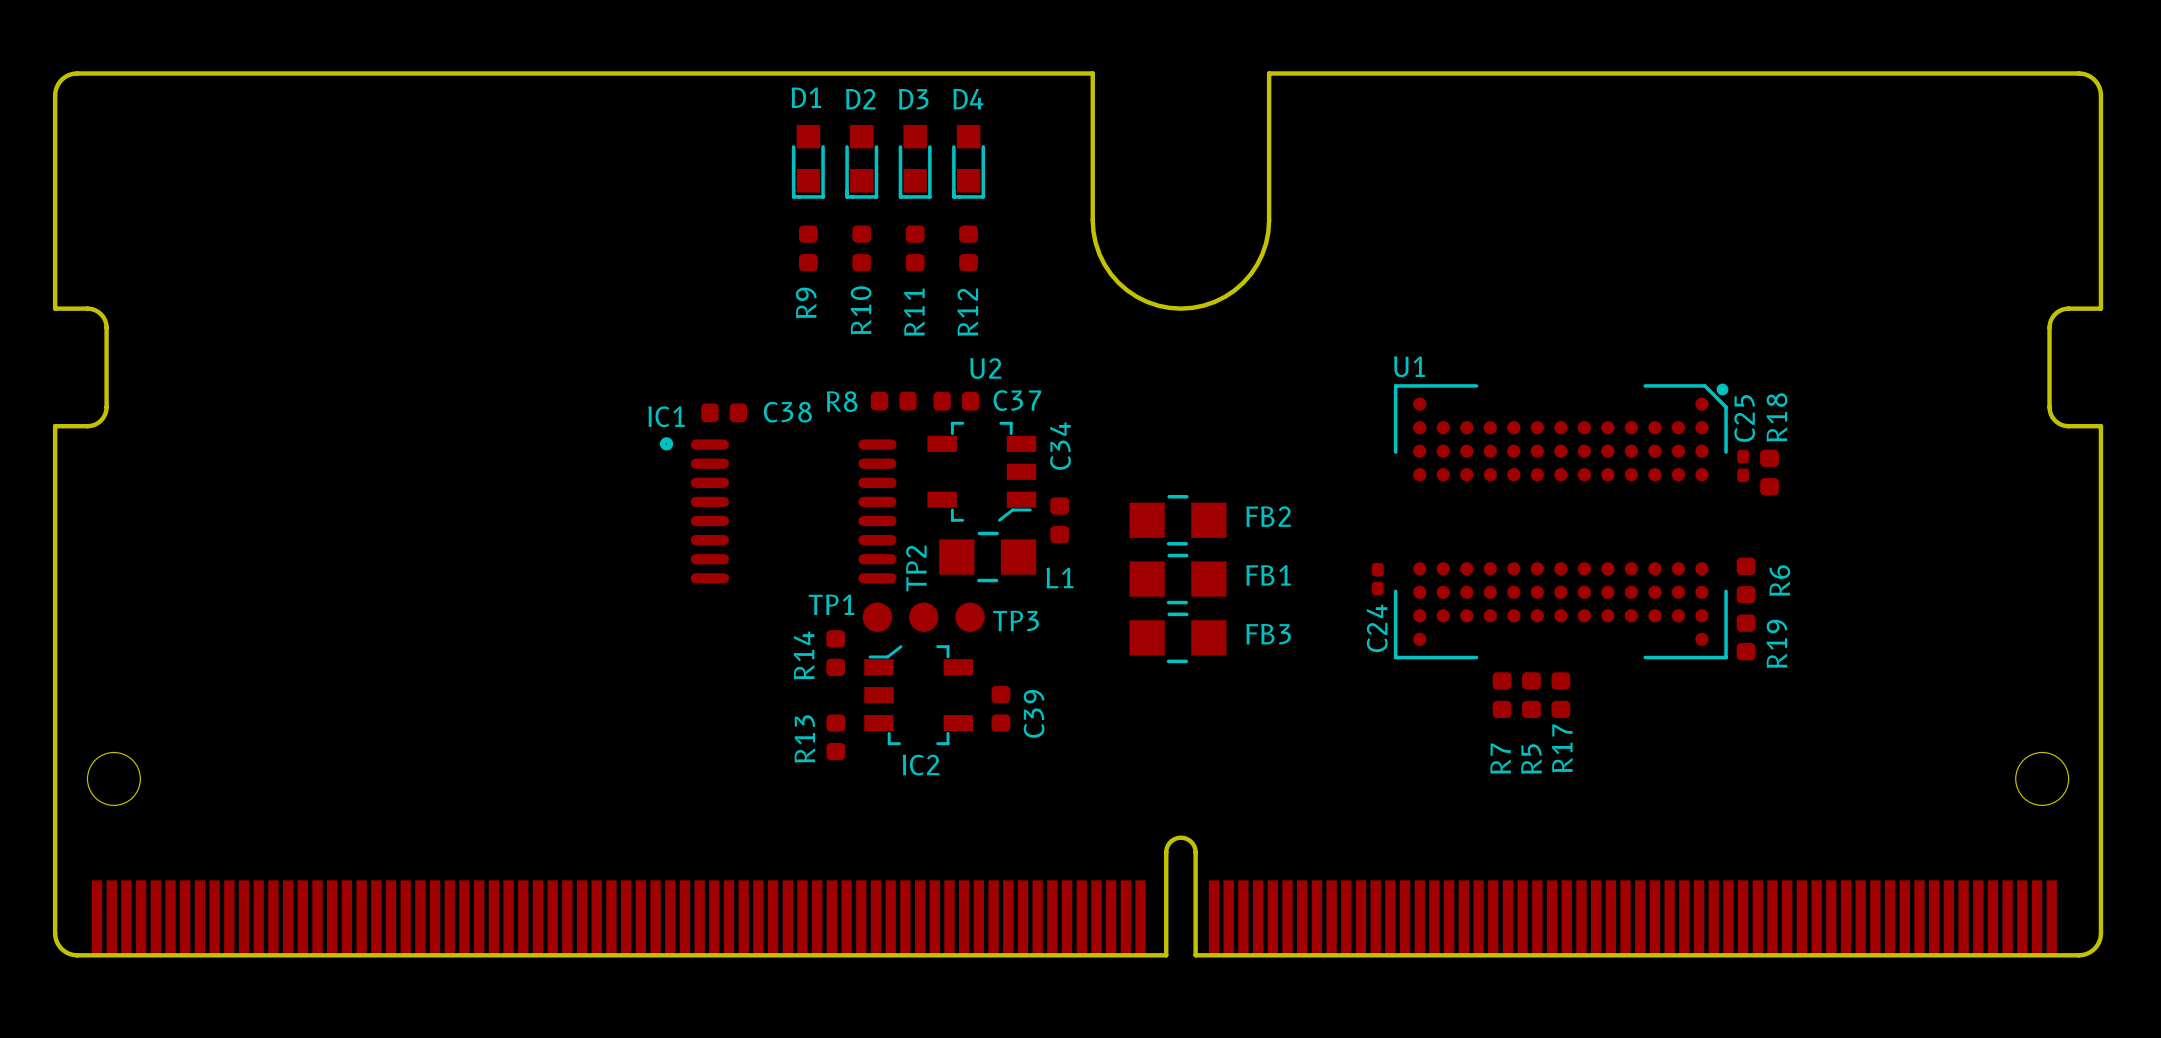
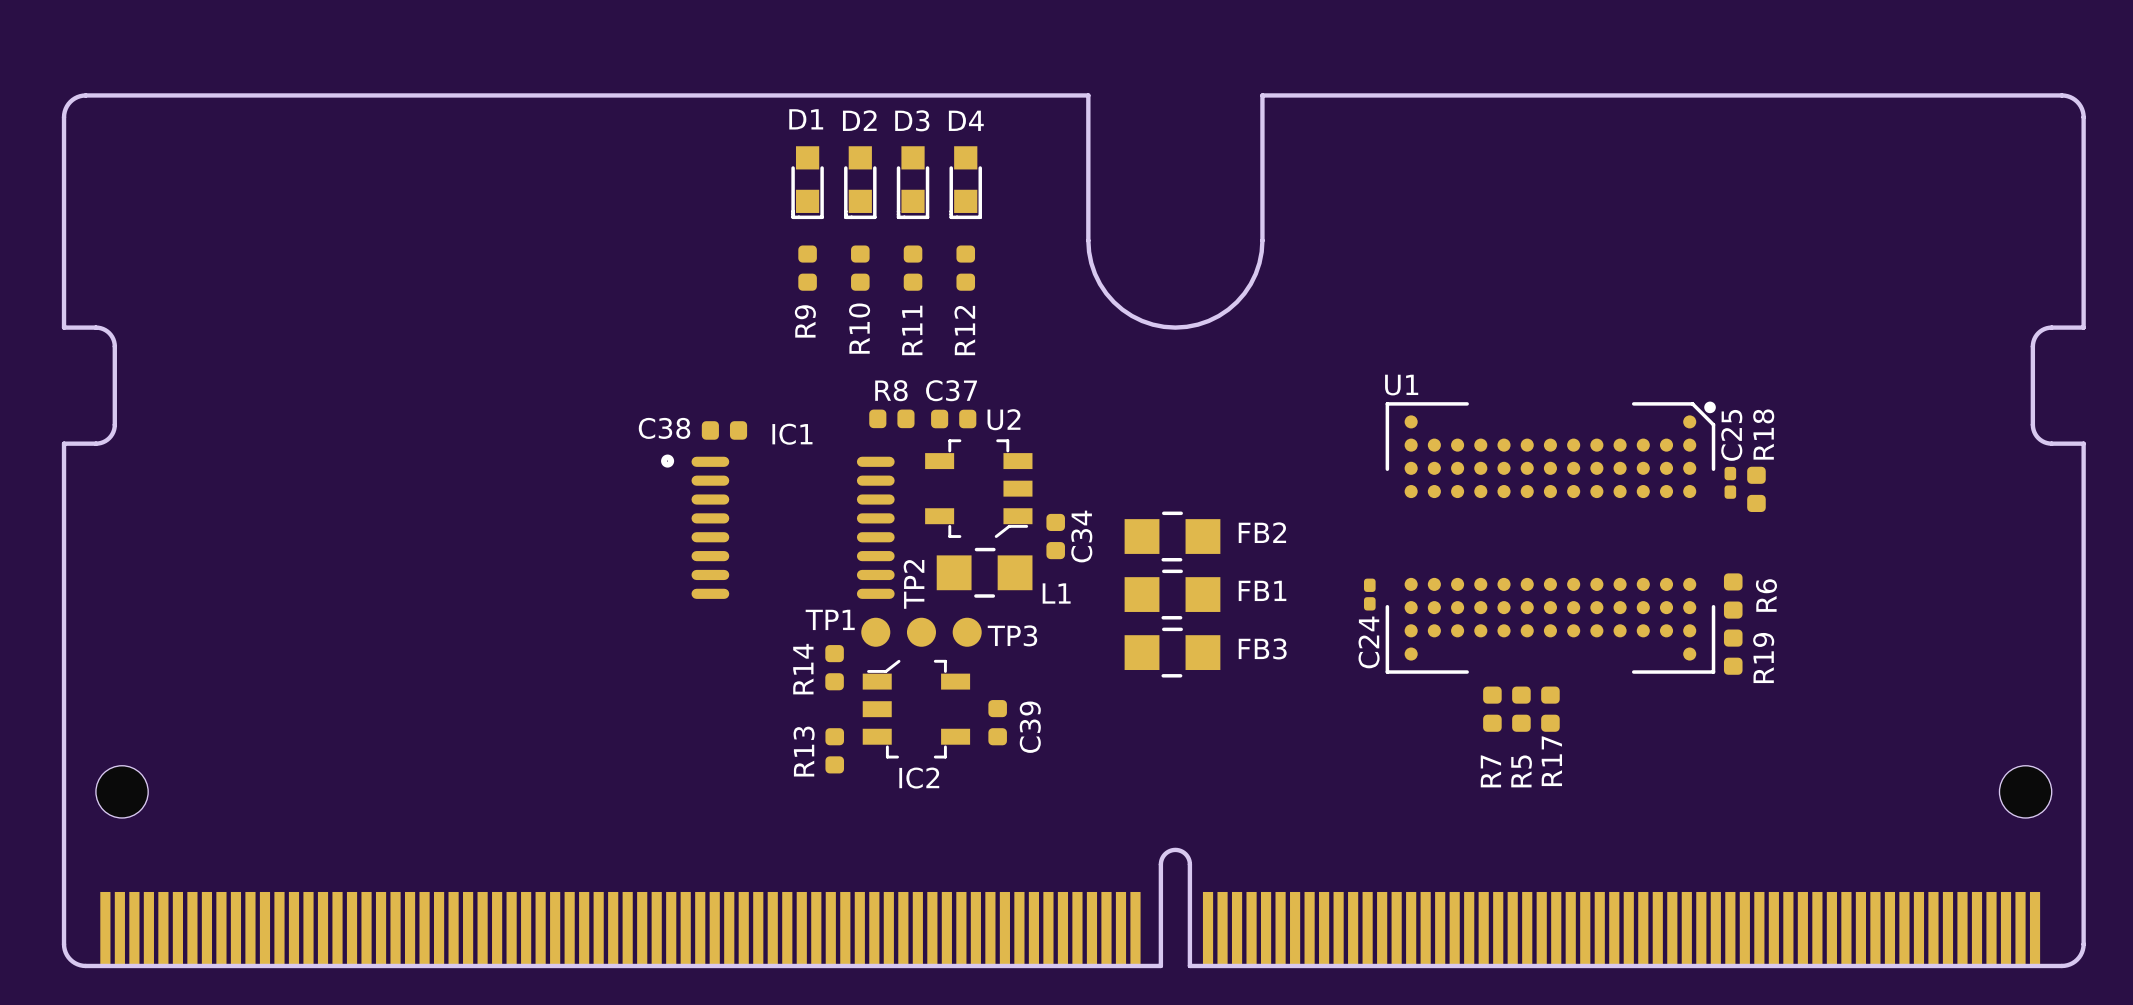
U2 name position: U2 (985, 368) -> U2 (1004, 419)
C37 name position: C37 (1017, 400) -> C37 (951, 390)
R8 name position: R8 (842, 401) -> R8 (891, 390)
C38 name position: C38 (787, 412) -> C38 (664, 428)
IC1 name position: IC1 (666, 416) -> IC1 (792, 434)
C34 name position: C34 (1060, 446) -> C34 (1081, 536)

